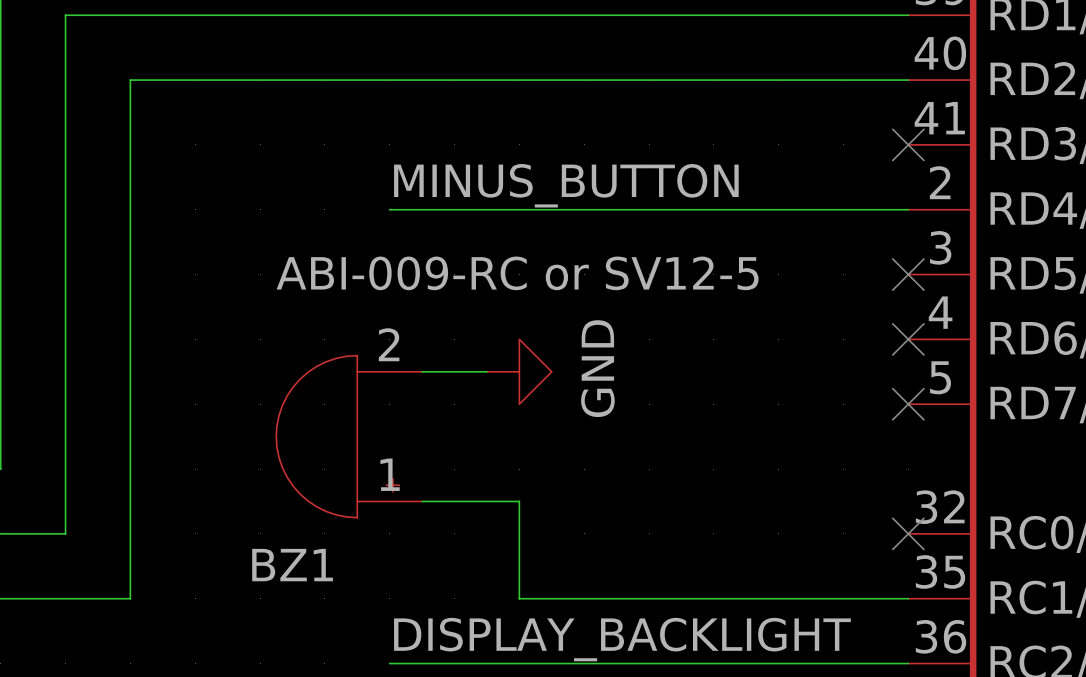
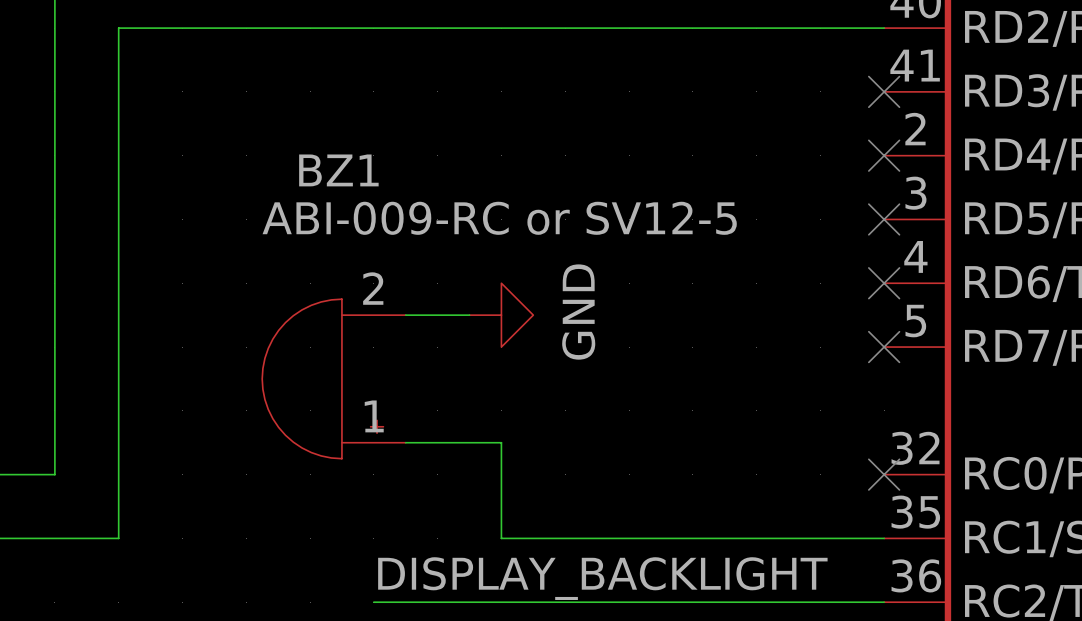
label: MINUS_BUTTON (566, 185) -> none
wire: (389, 209) (908, 209) -> none
no-connect mark: none -> (884, 155)
BZ1 name position: BZ1 (292, 565) -> BZ1 (338, 170)

